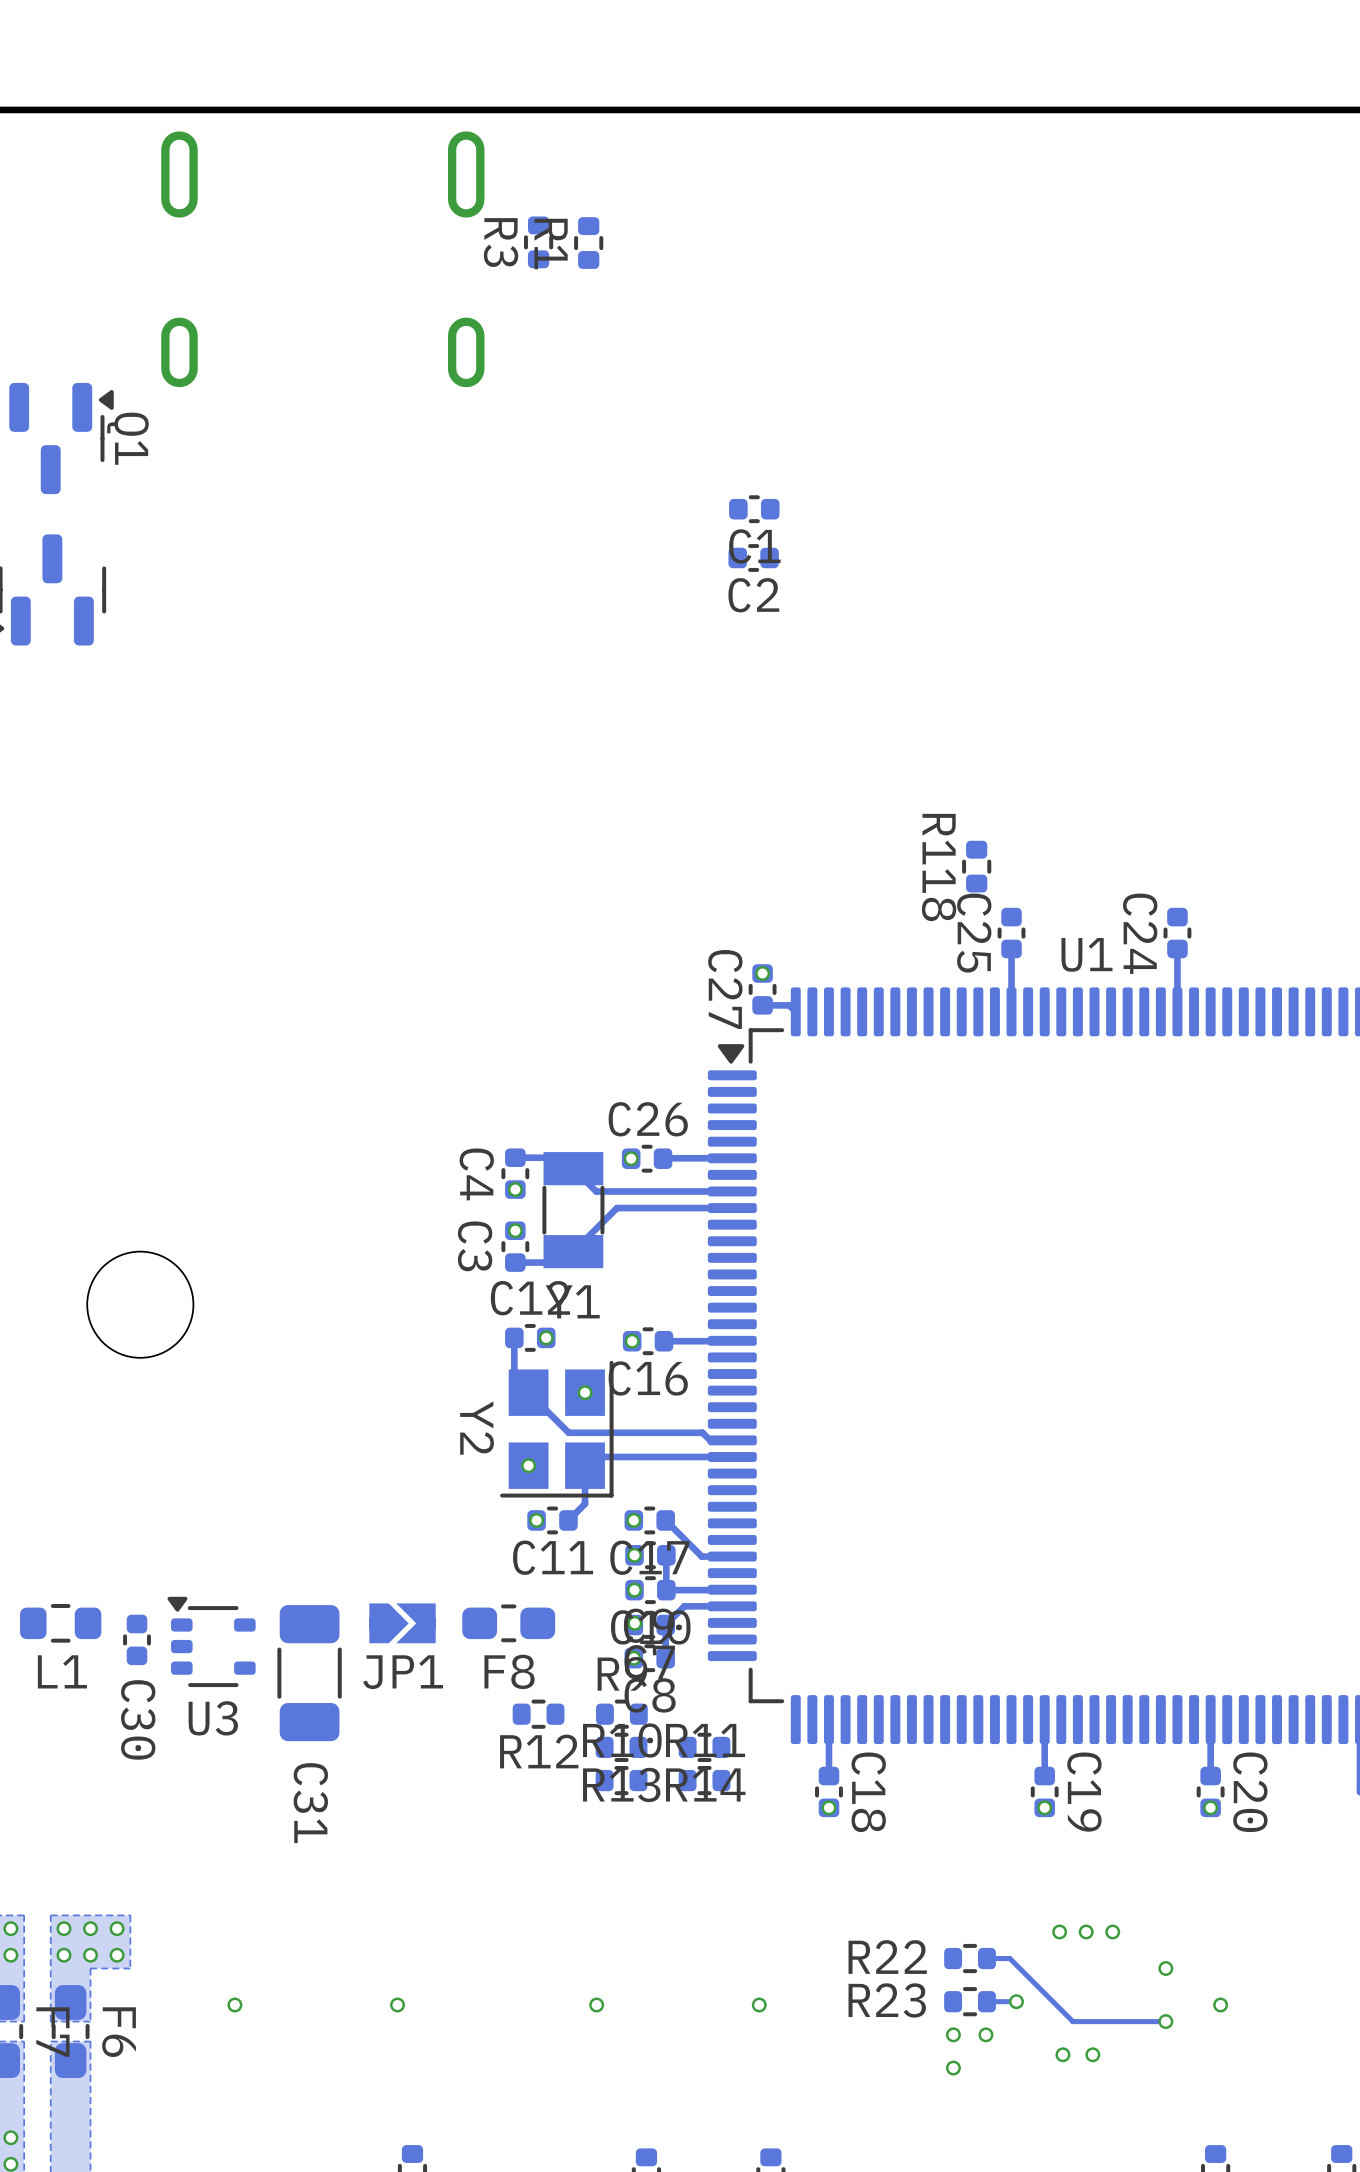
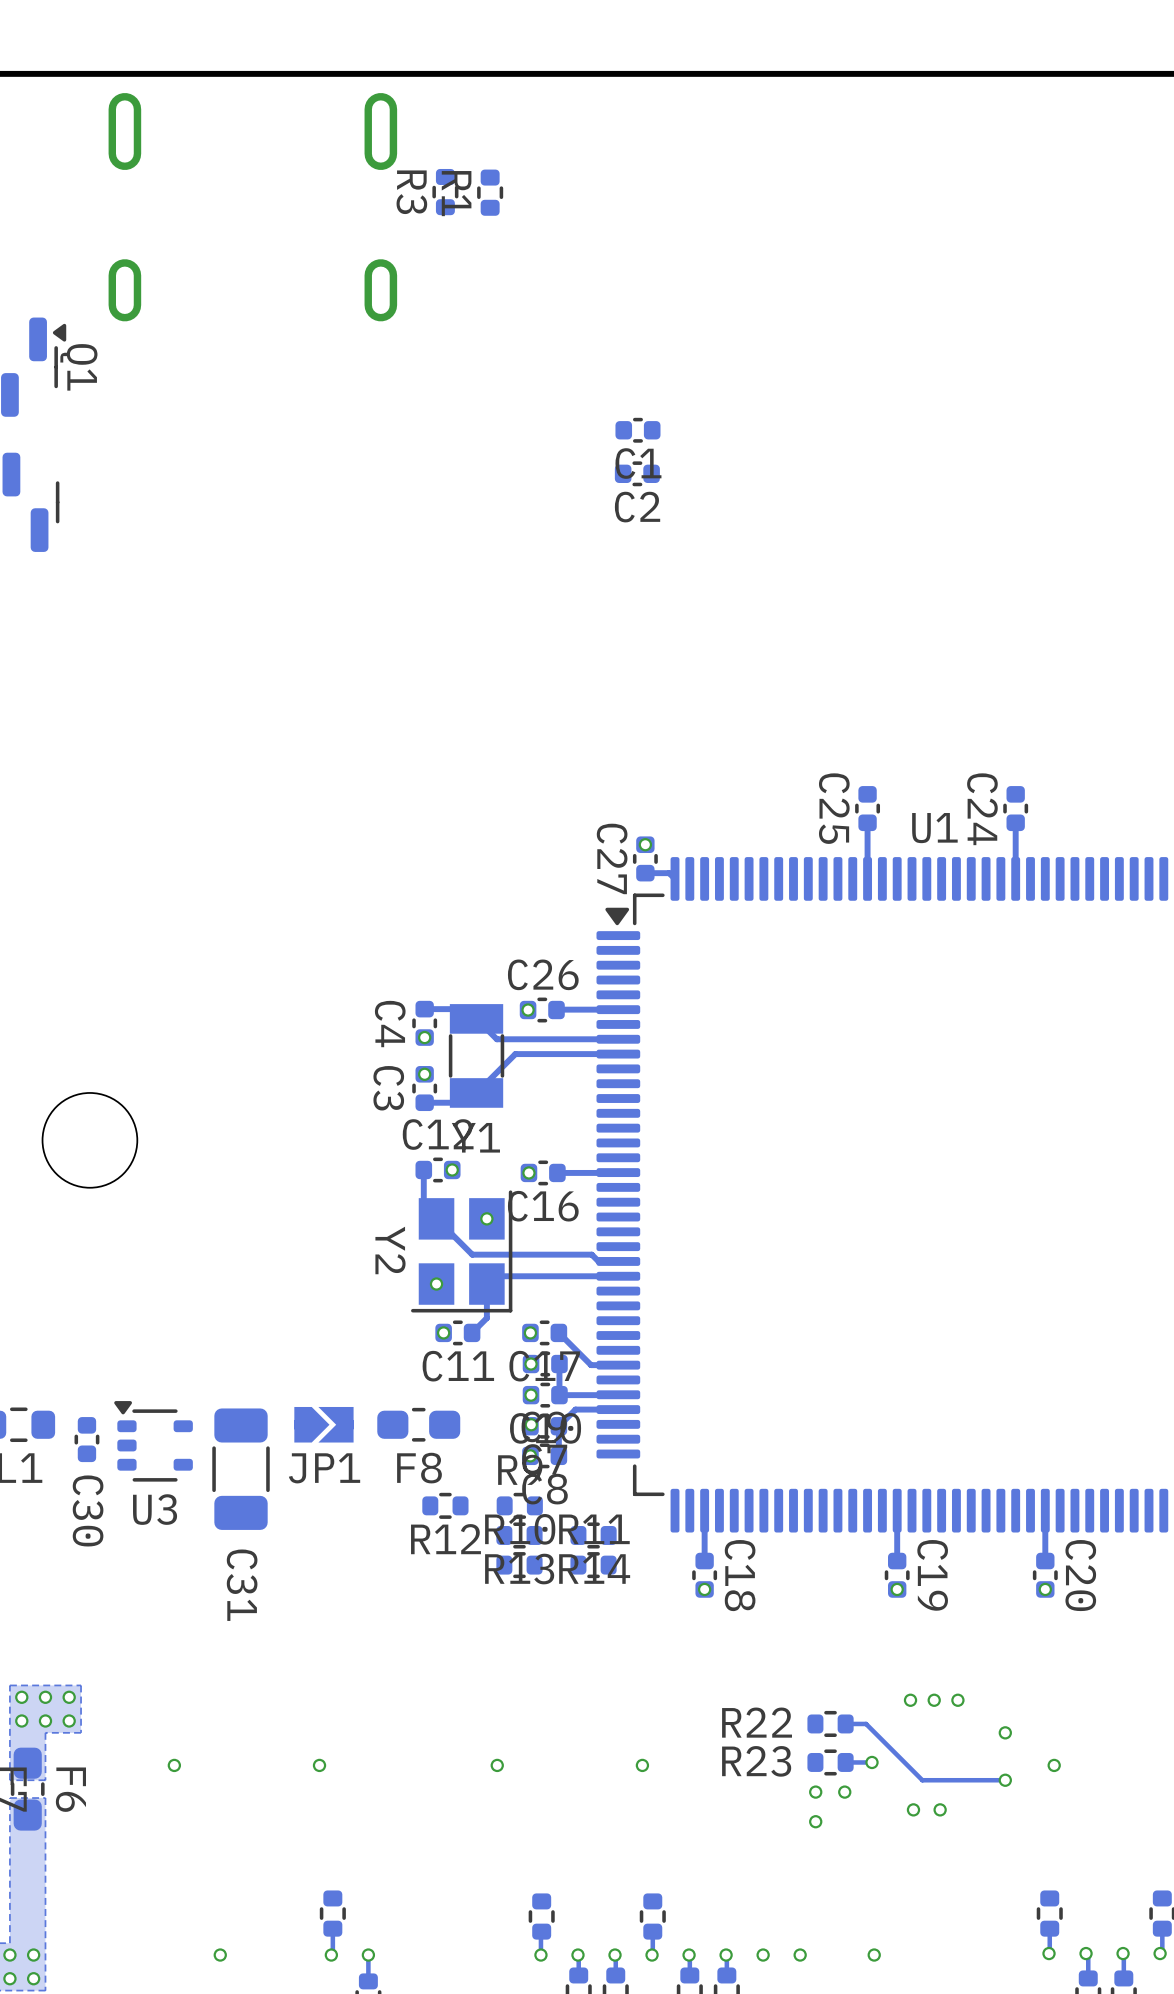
R118: (976, 866) -> none

